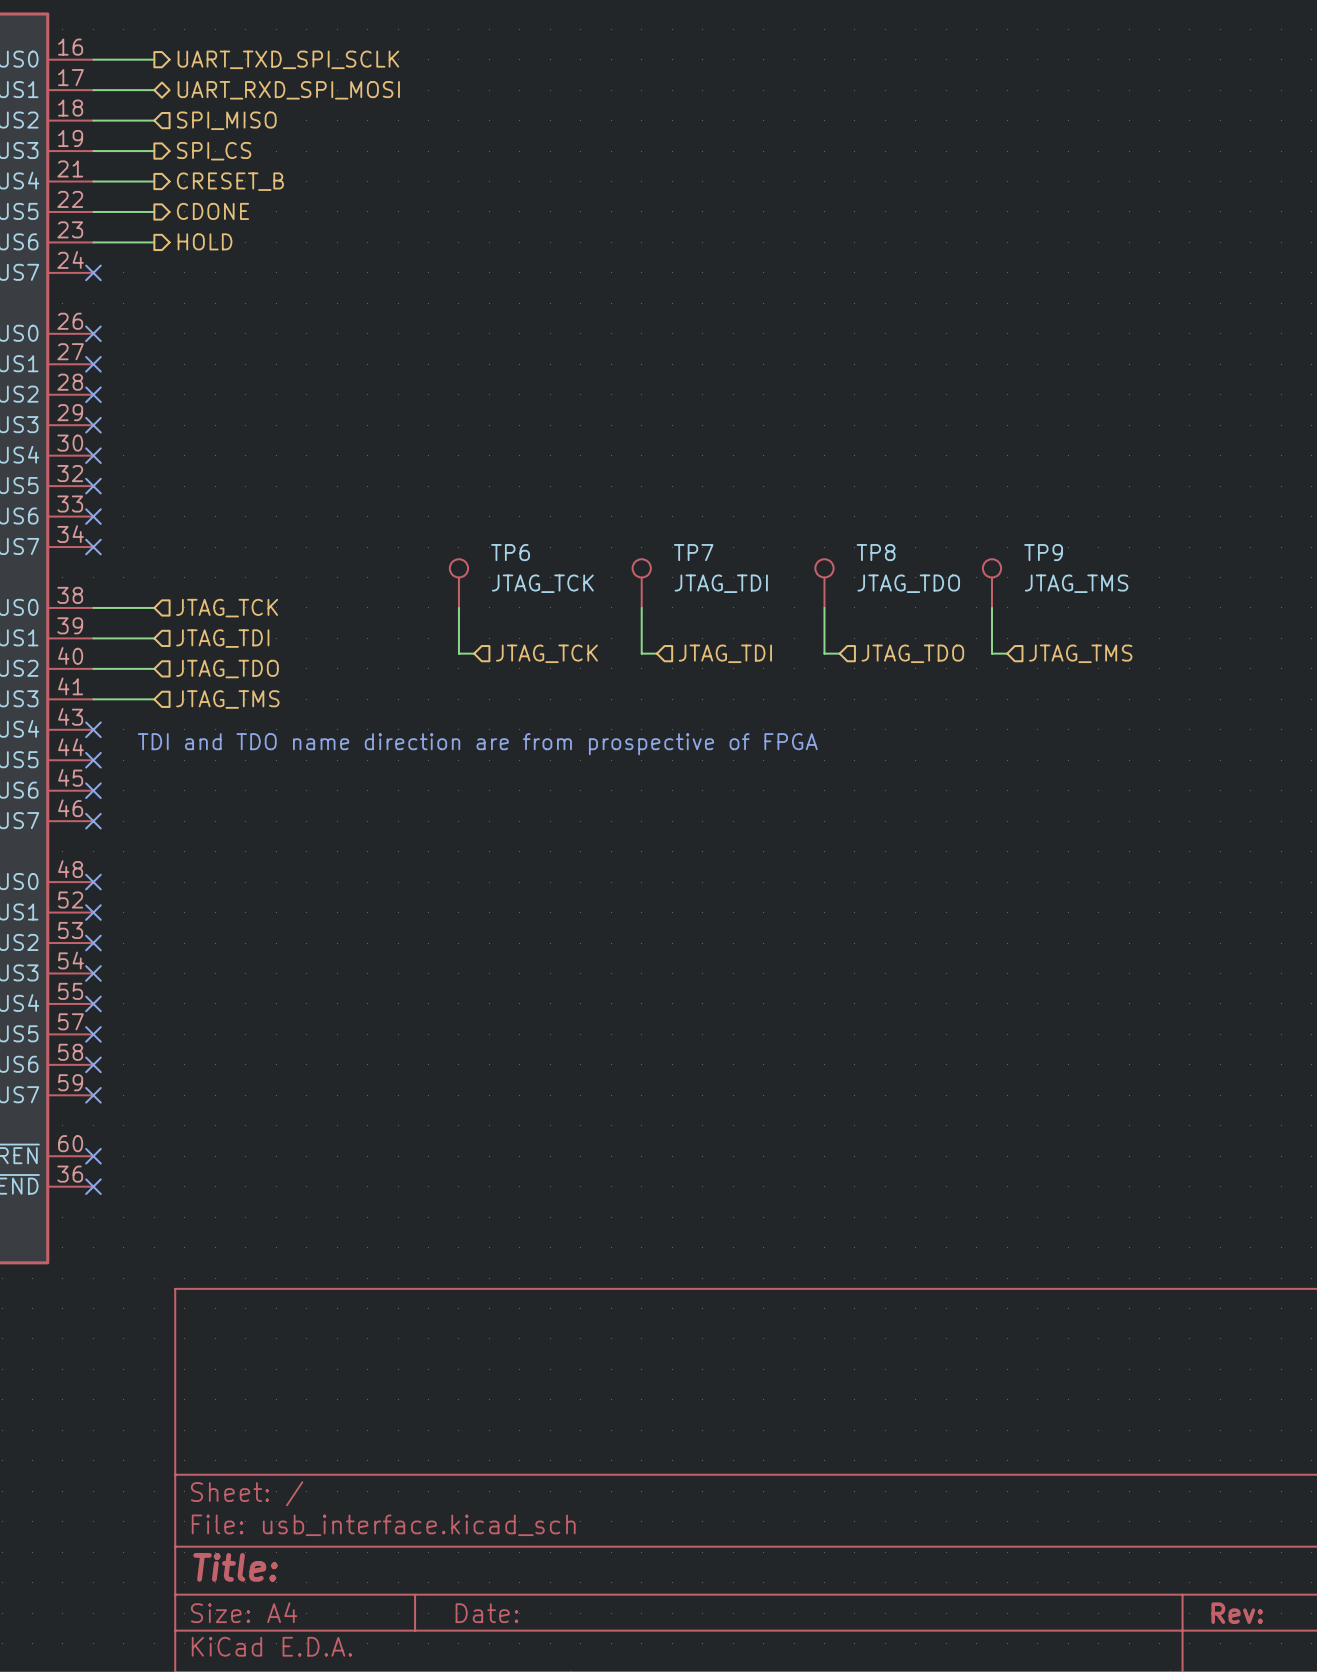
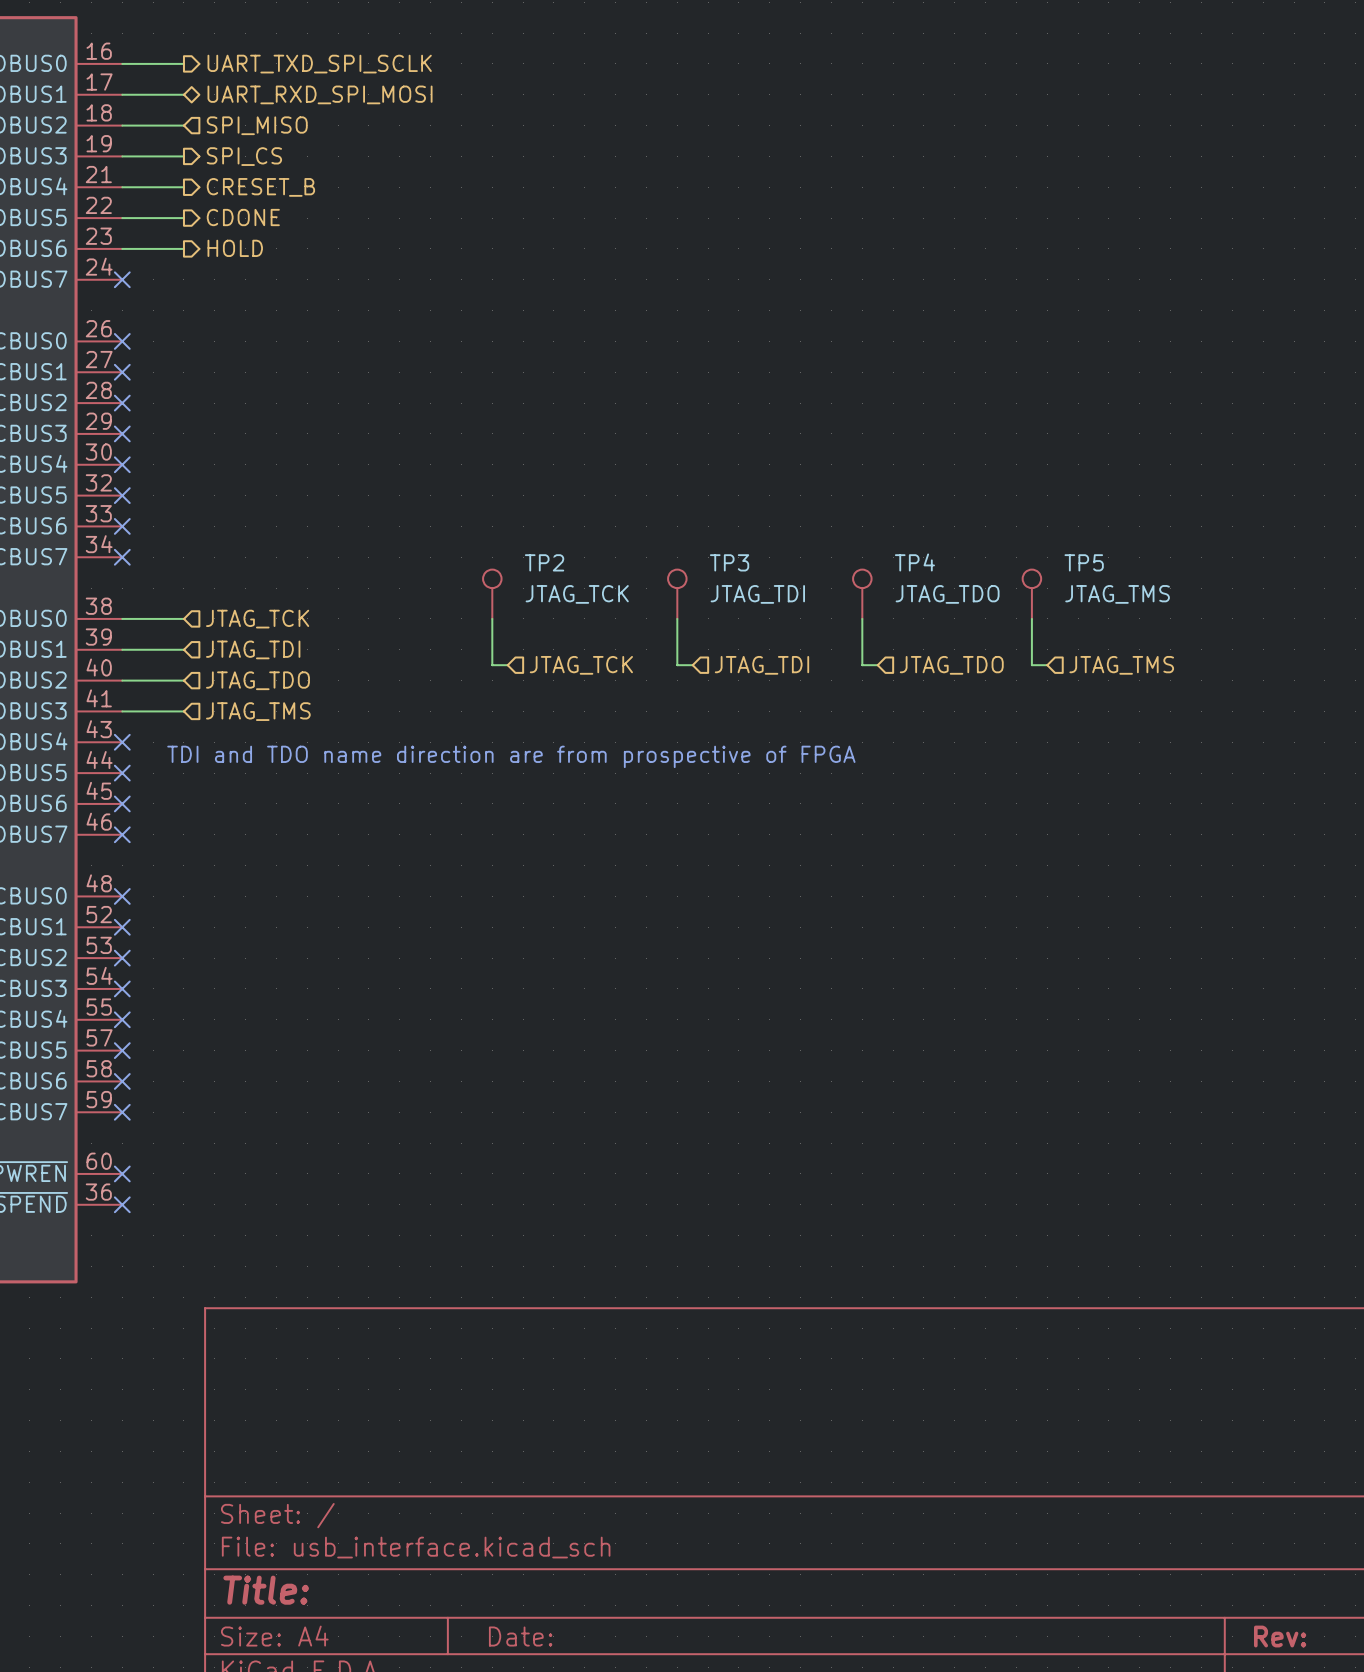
TP6 name: TP6 (510, 552) -> TP2 (544, 562)
TP7 name: TP7 (693, 552) -> TP3 (729, 562)
TP8 name: TP8 (876, 552) -> TP4 (914, 562)
TP9 name: TP9 (1043, 552) -> TP5 (1084, 562)

